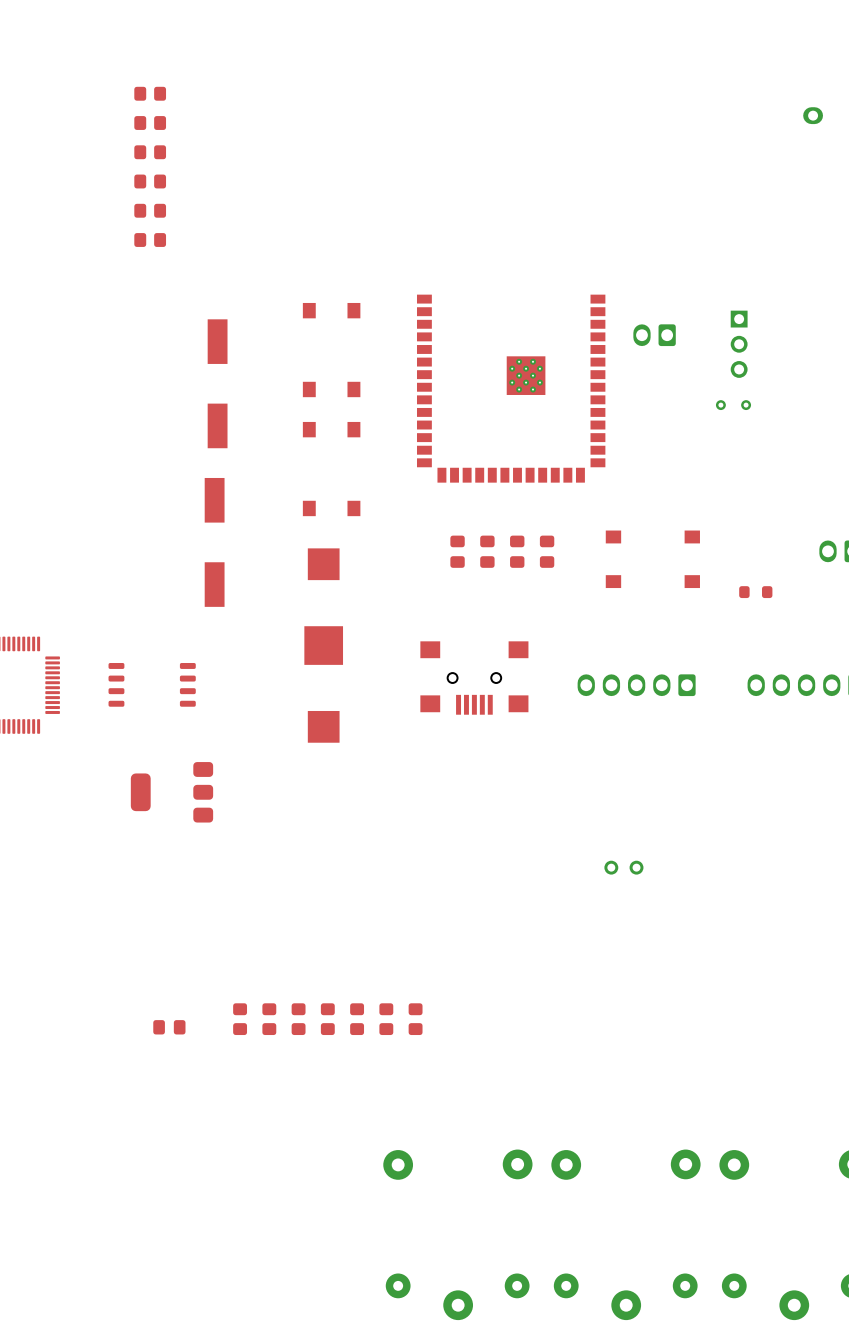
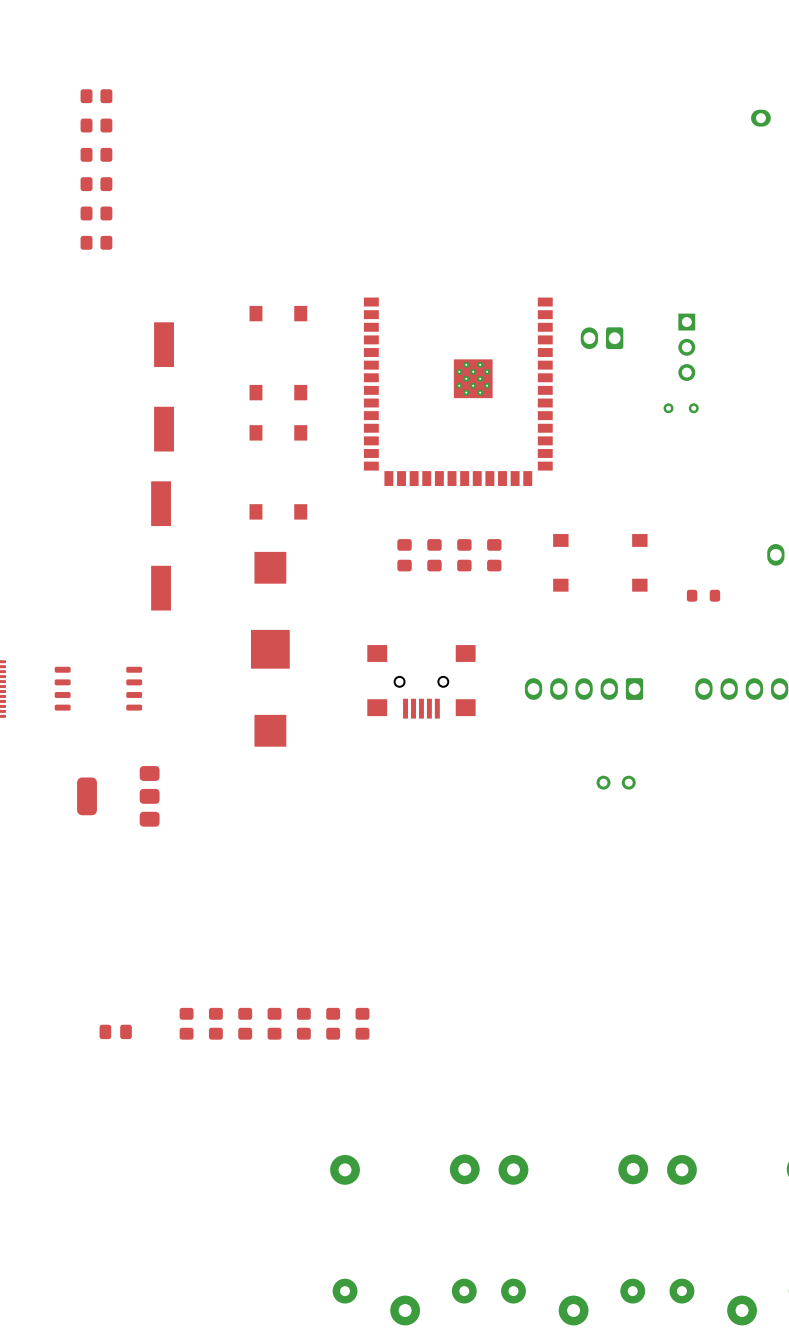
part position: (623, 867) -> (616, 782)

